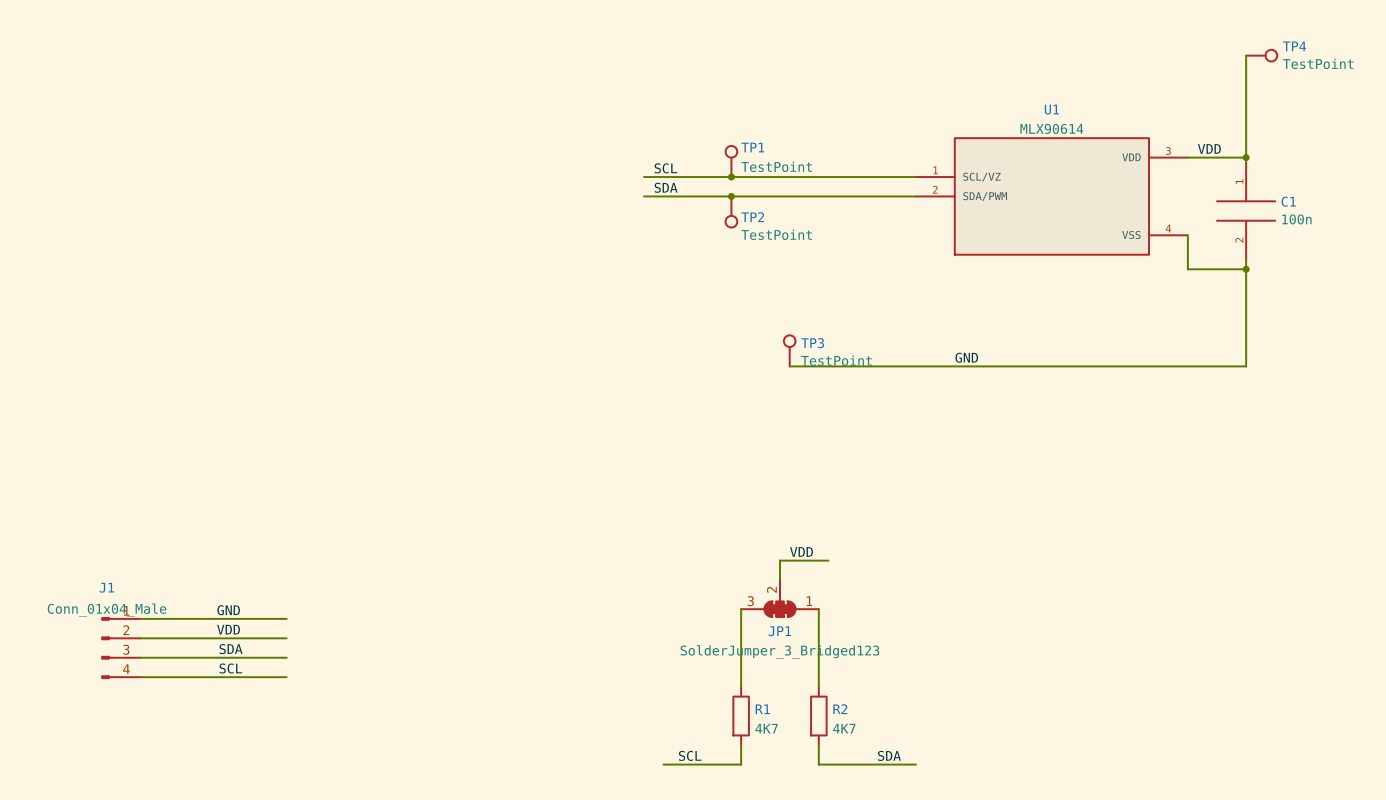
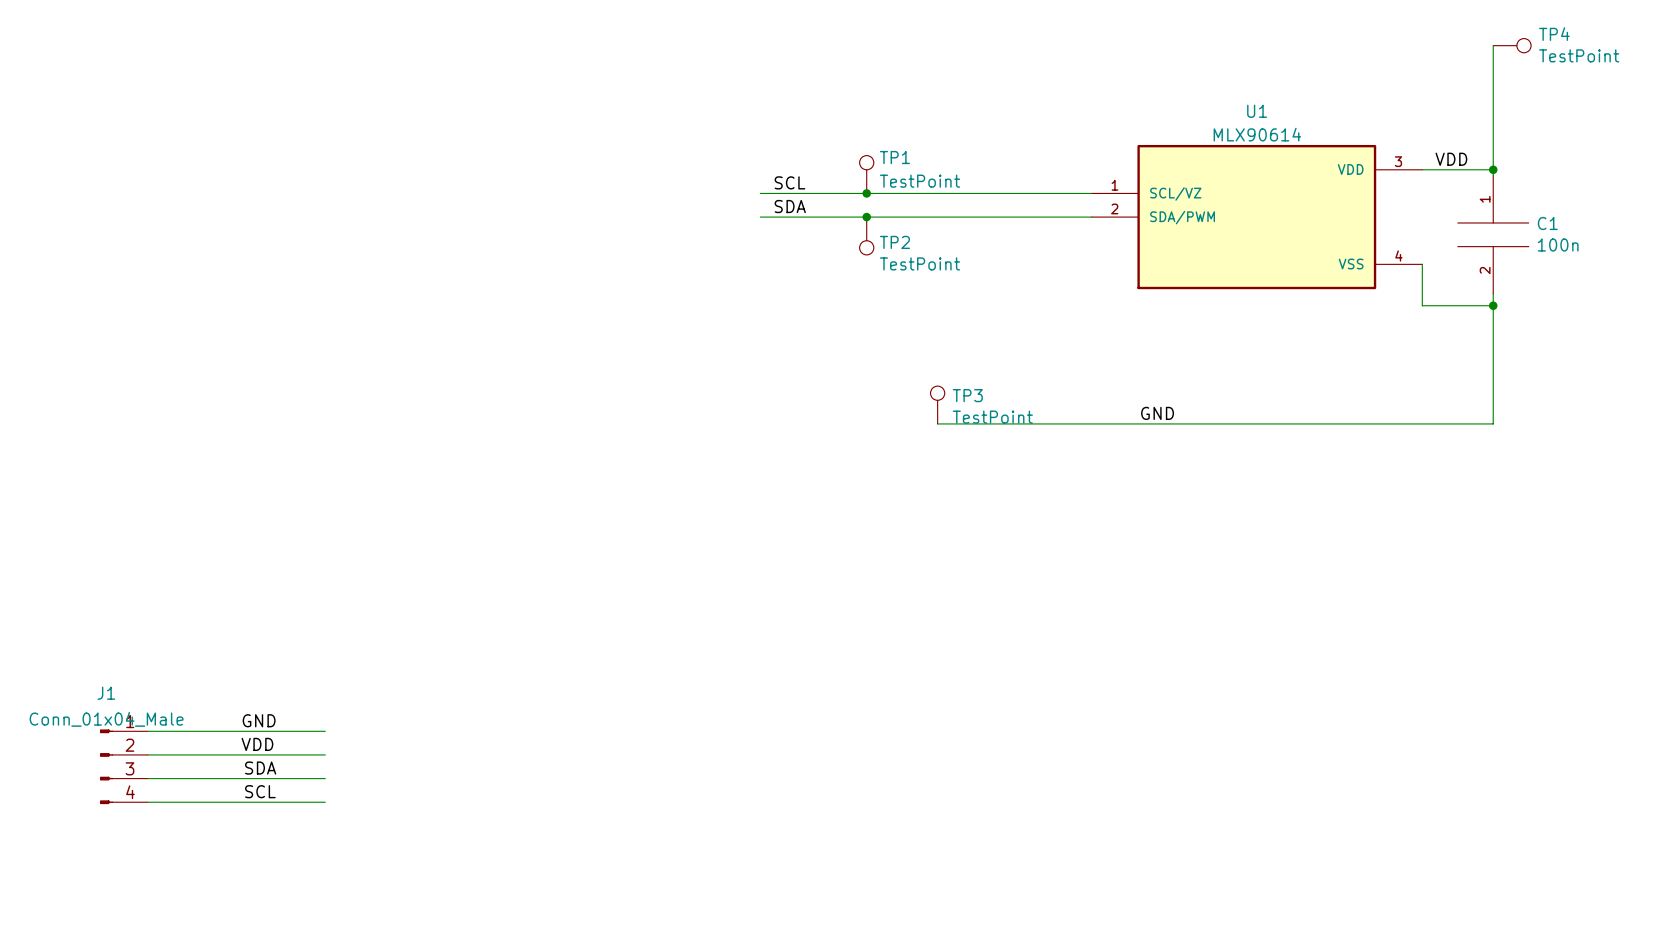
label: VDD (801, 551) -> none
wire: (828, 560) (779, 560) (779, 580) -> none
JP1: SolderJumper_3_Bridged123 (779, 598) -> none
wire: (741, 609) (741, 686) -> none
wire: (818, 609) (818, 686) -> none
R1: 4K7 (741, 716) -> none
R2: 4K7 (818, 716) -> none
wire: (741, 745) (741, 764) (663, 764) -> none
wire: (818, 745) (818, 764) (915, 764) -> none
label: SCL (690, 755) -> none
label: SDA (889, 755) -> none

